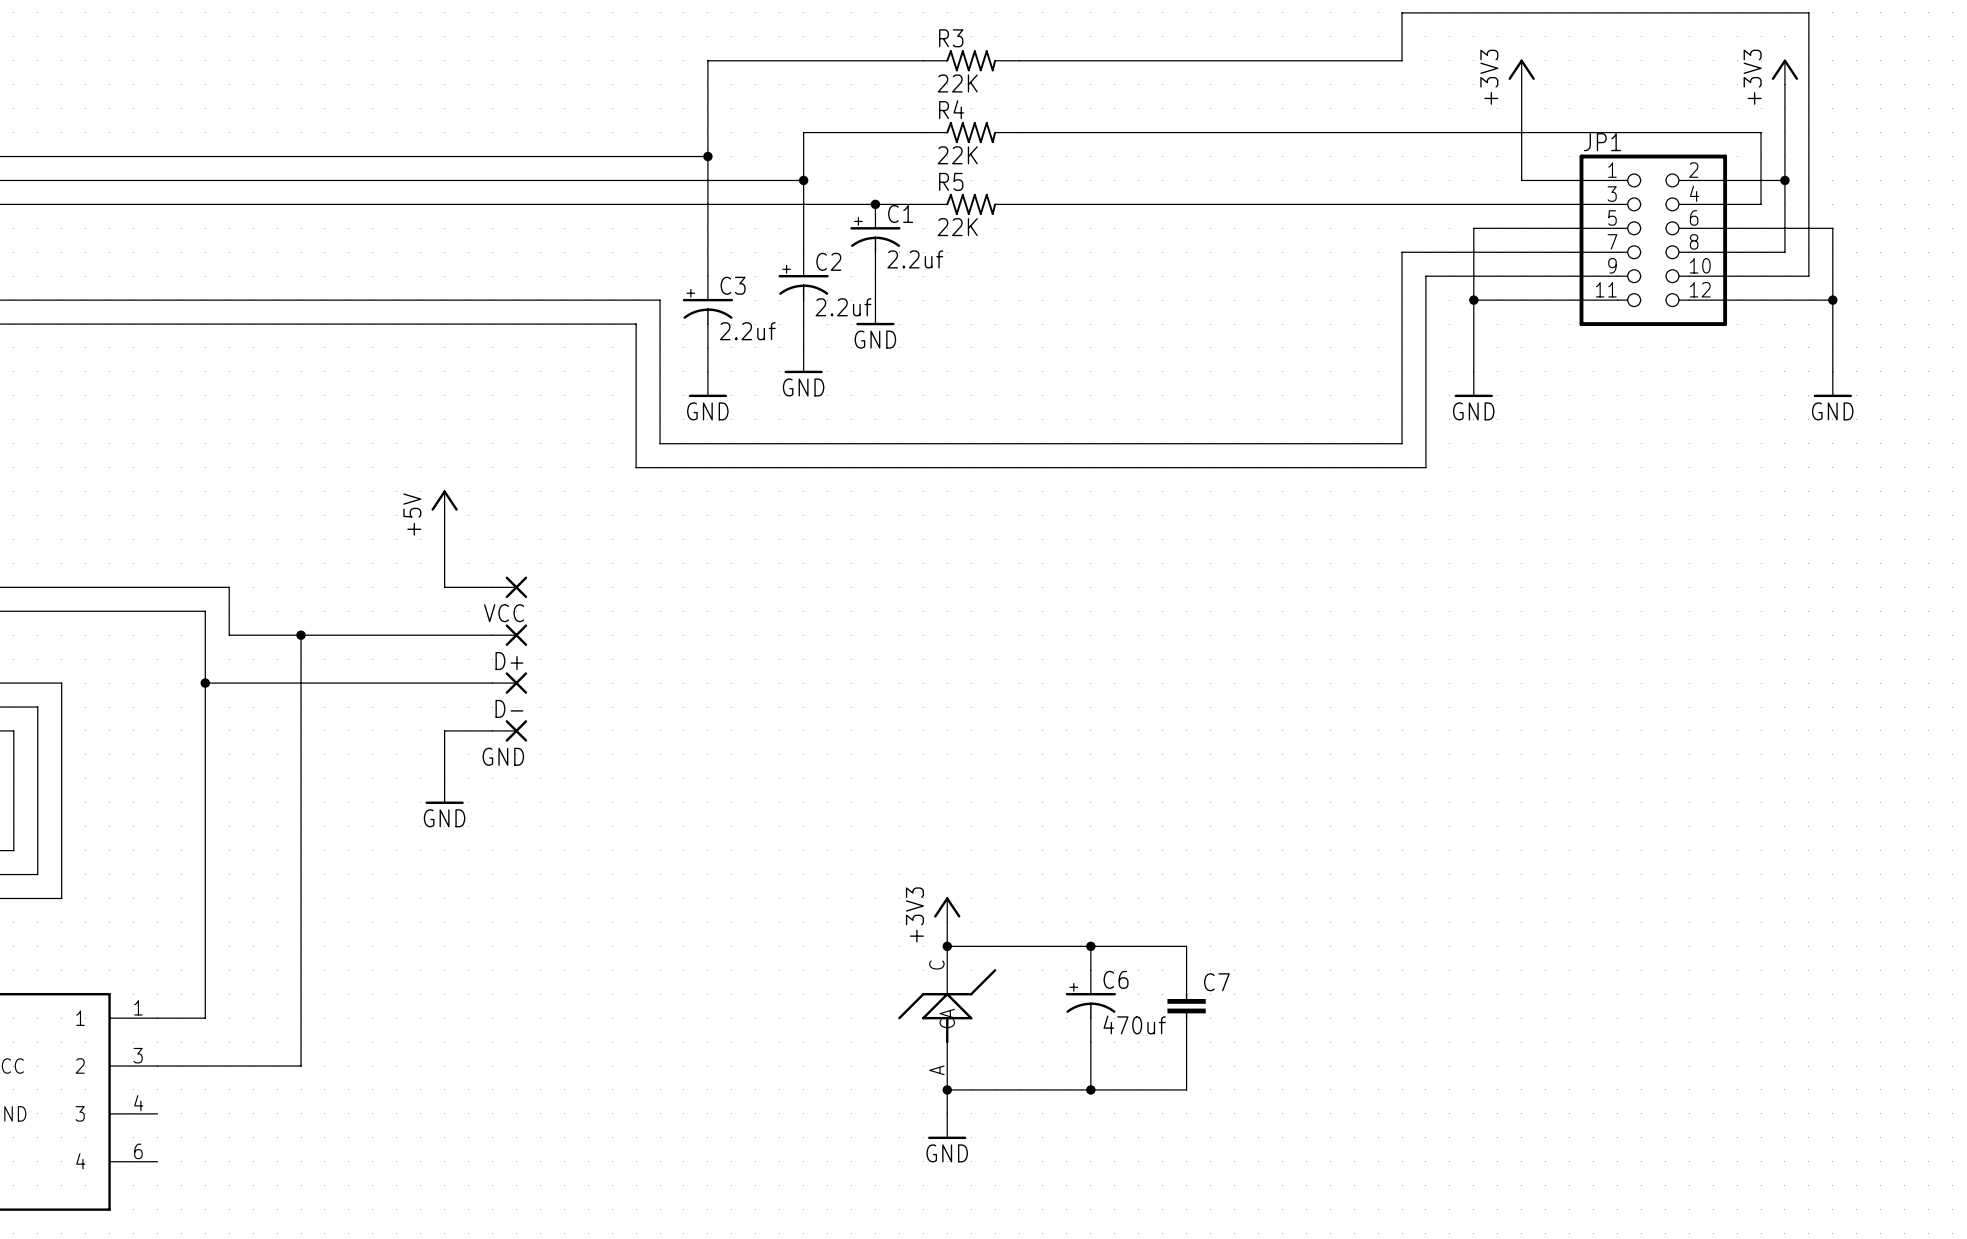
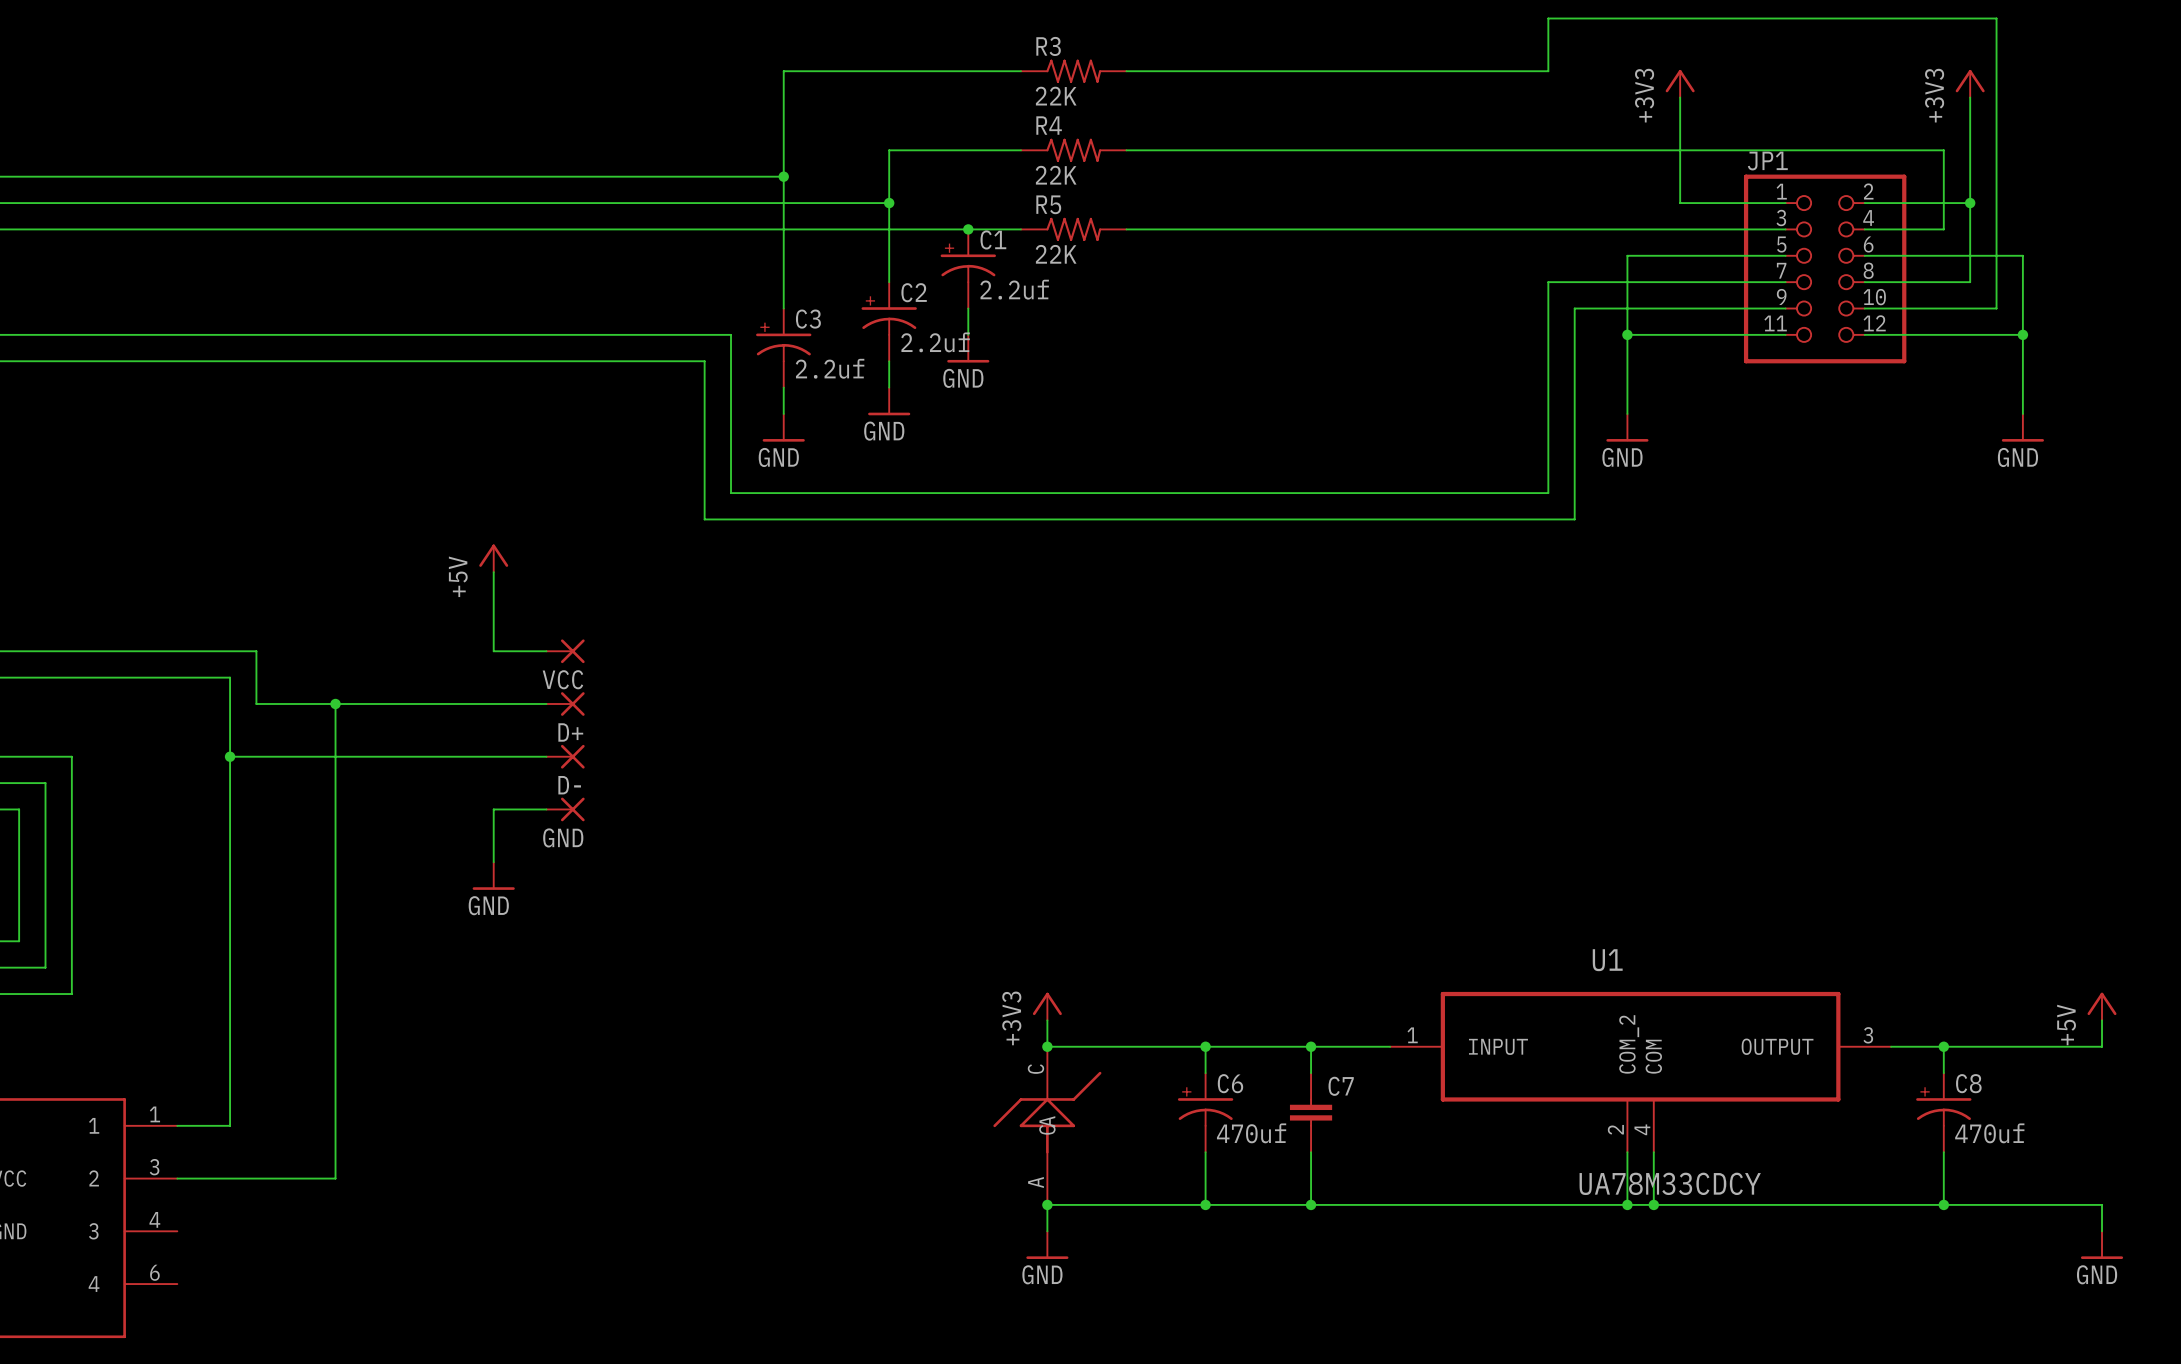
power symbol: none -> +5V (2102, 1006)
wire: none -> (2102, 1020) (2102, 1046) (1891, 1046)
wire: none -> (1311, 1046) (1390, 1046)
junction: none -> (1311, 1046)
wire: none -> (1943, 1046) (1943, 1073)
junction: none -> (1943, 1046)
U1: none -> UA78M33CDCY (1640, 1072)
C8: none -> 470uf (1943, 1112)
wire: none -> (1627, 1152) (1627, 1204)
wire: none -> (1653, 1152) (1653, 1204)
wire: none -> (1943, 1152) (1943, 1204)
wire: none -> (1311, 1204) (2102, 1204) (2102, 1231)
junction: none -> (1311, 1204)
junction: none -> (1627, 1204)
junction: none -> (1653, 1204)
junction: none -> (1943, 1204)
power symbol: none -> GND (2102, 1245)

